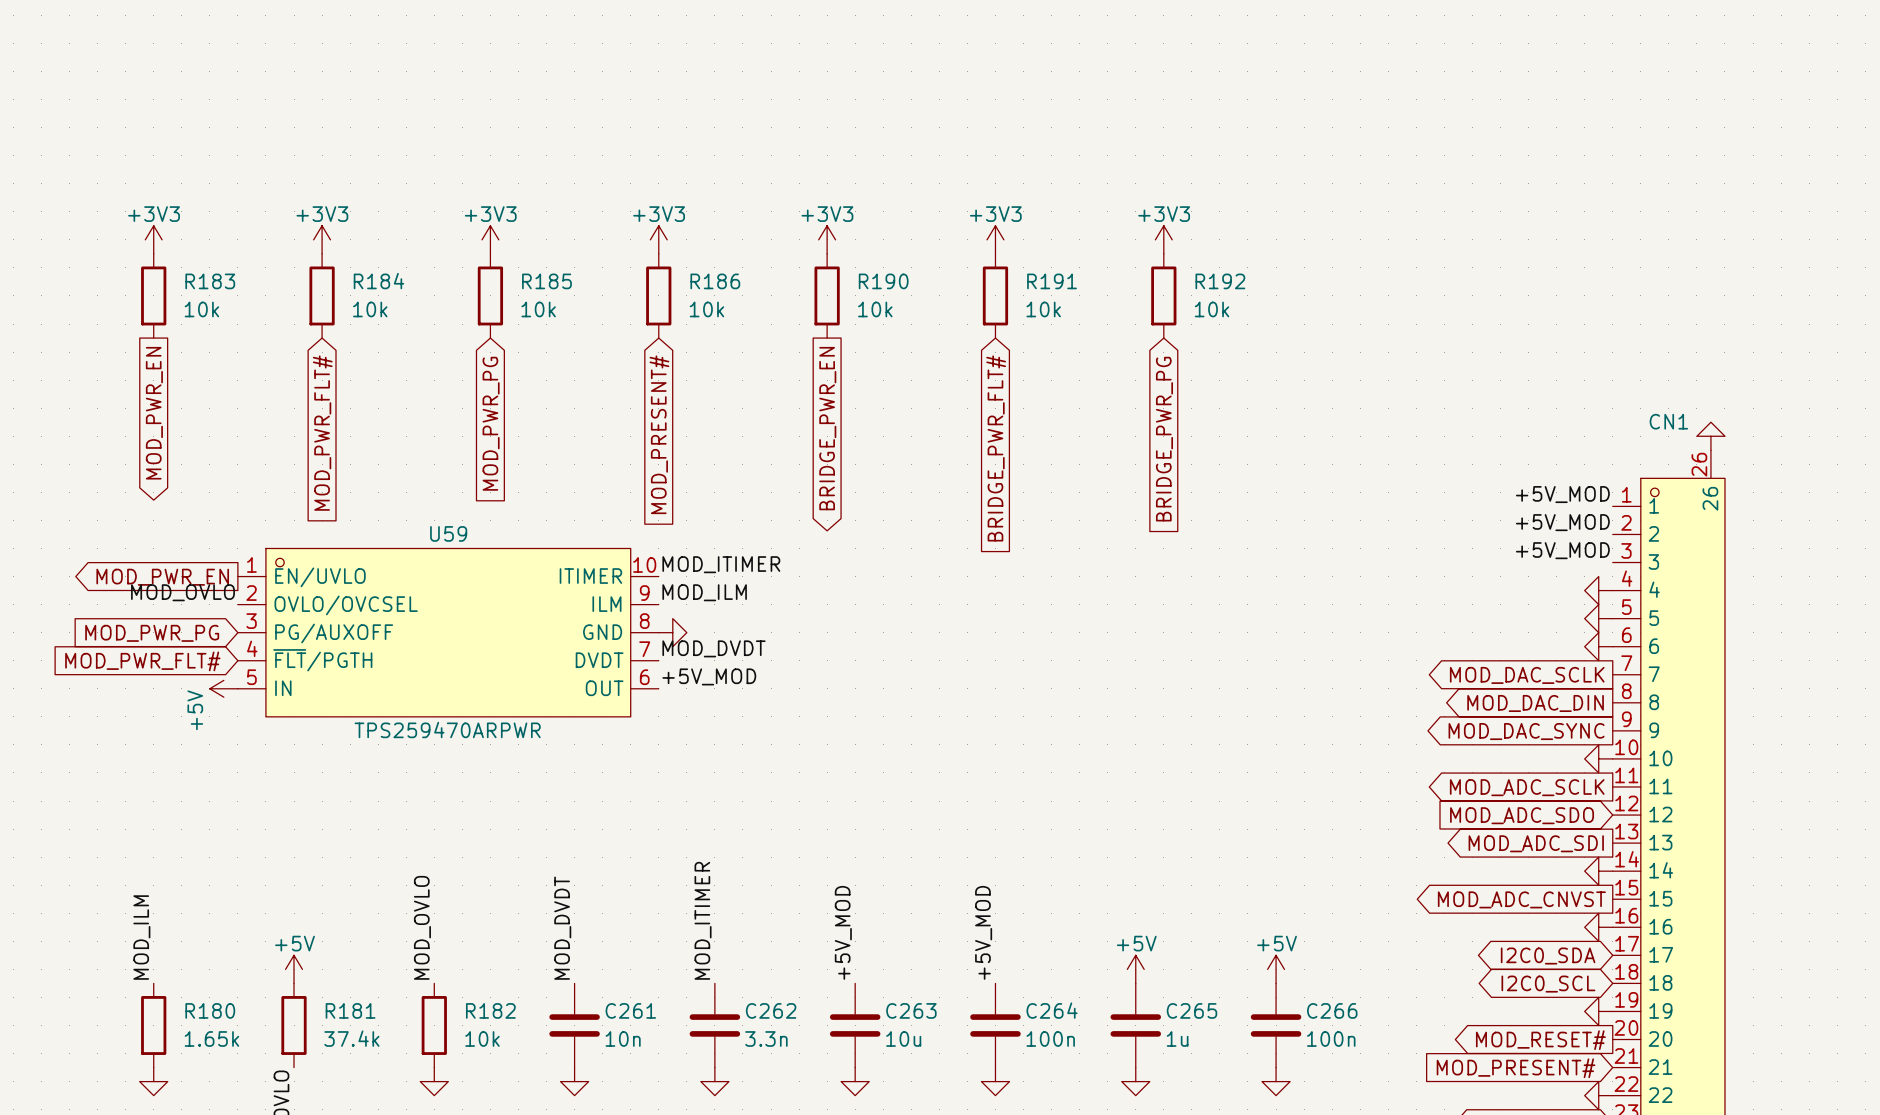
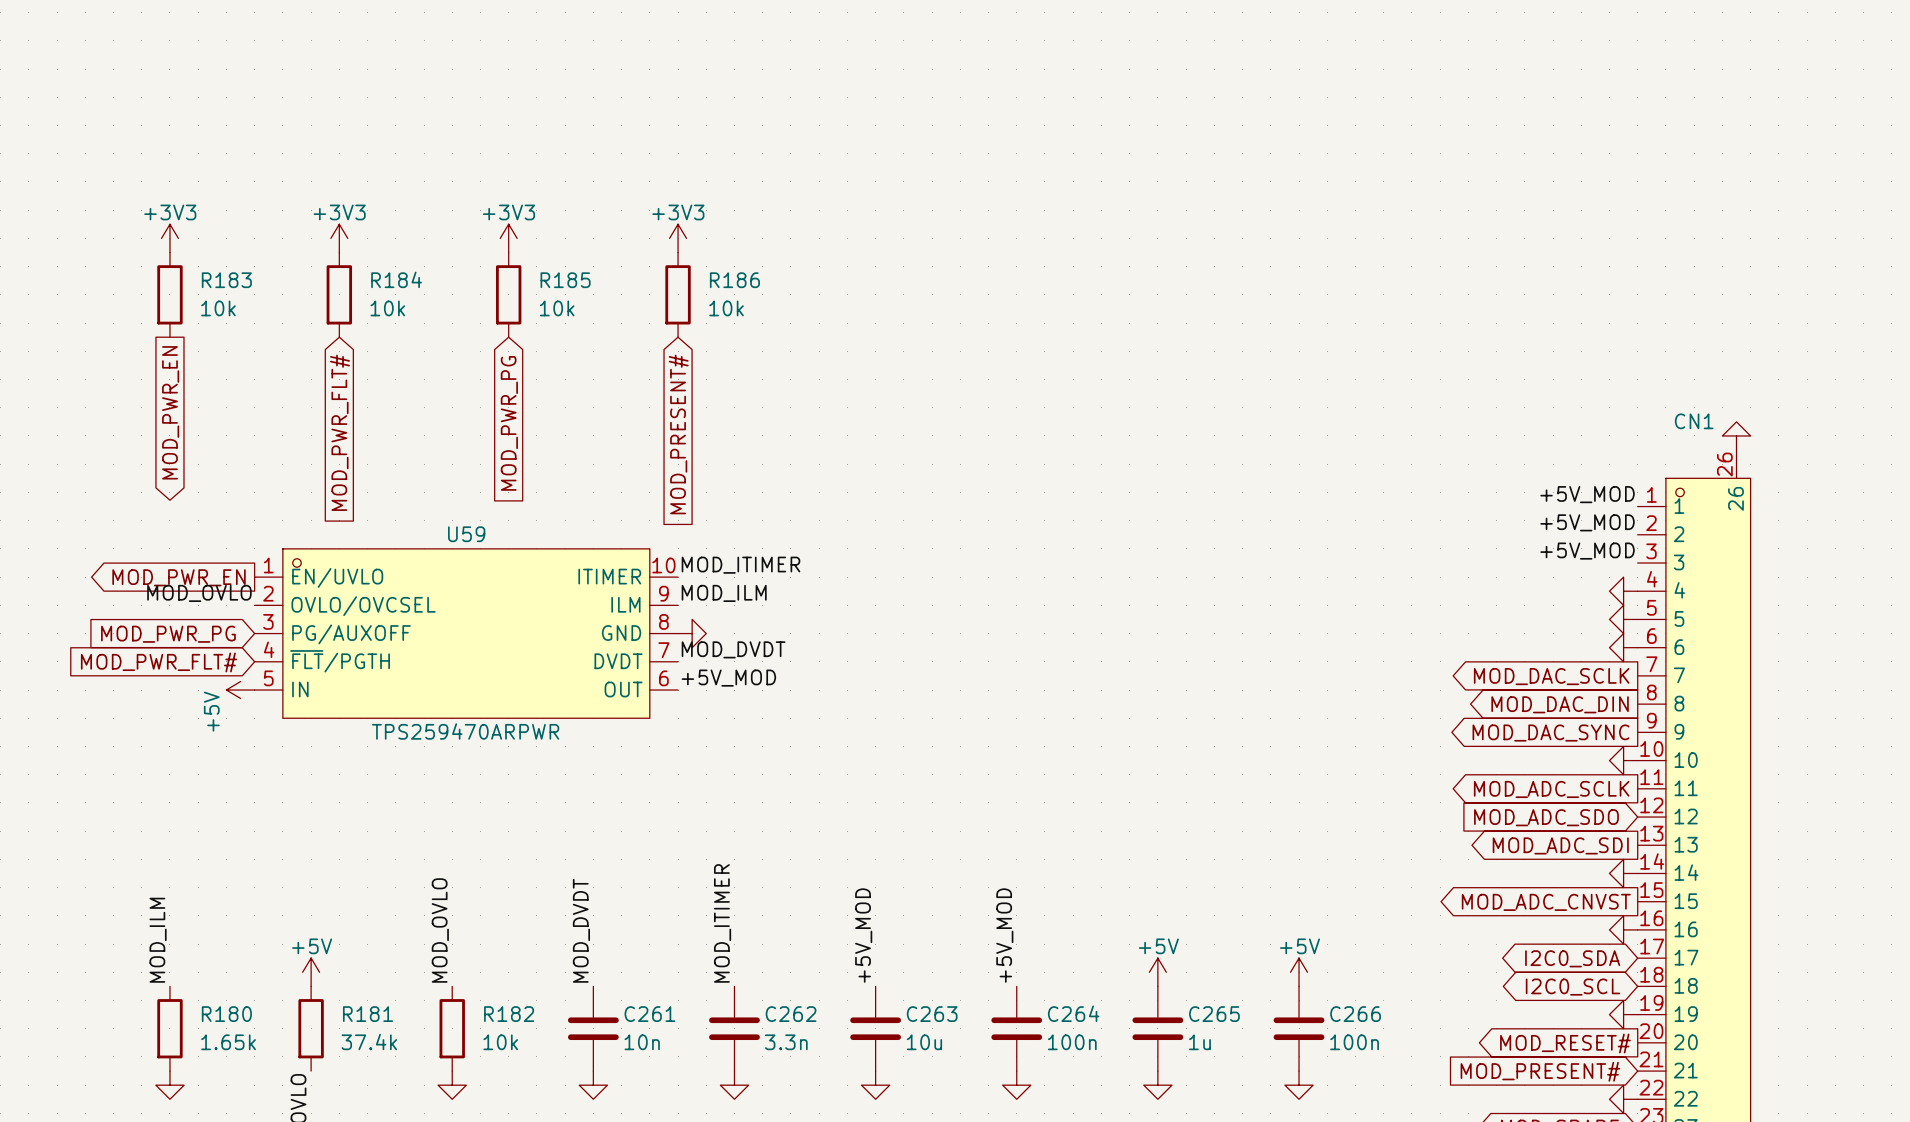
power symbol: +3V3 (827, 239) -> none
power symbol: +3V3 (995, 239) -> none
power symbol: +3V3 (1163, 239) -> none
R190: 10k (827, 295) -> none
R191: 10k (995, 295) -> none
R192: 10k (1163, 295) -> none
global label: BRIDGE_PWR_EN (827, 428) -> none
global label: BRIDGE_PWR_PG (1164, 439) -> none
global label: BRIDGE_PWR_FLT# (996, 448) -> none

